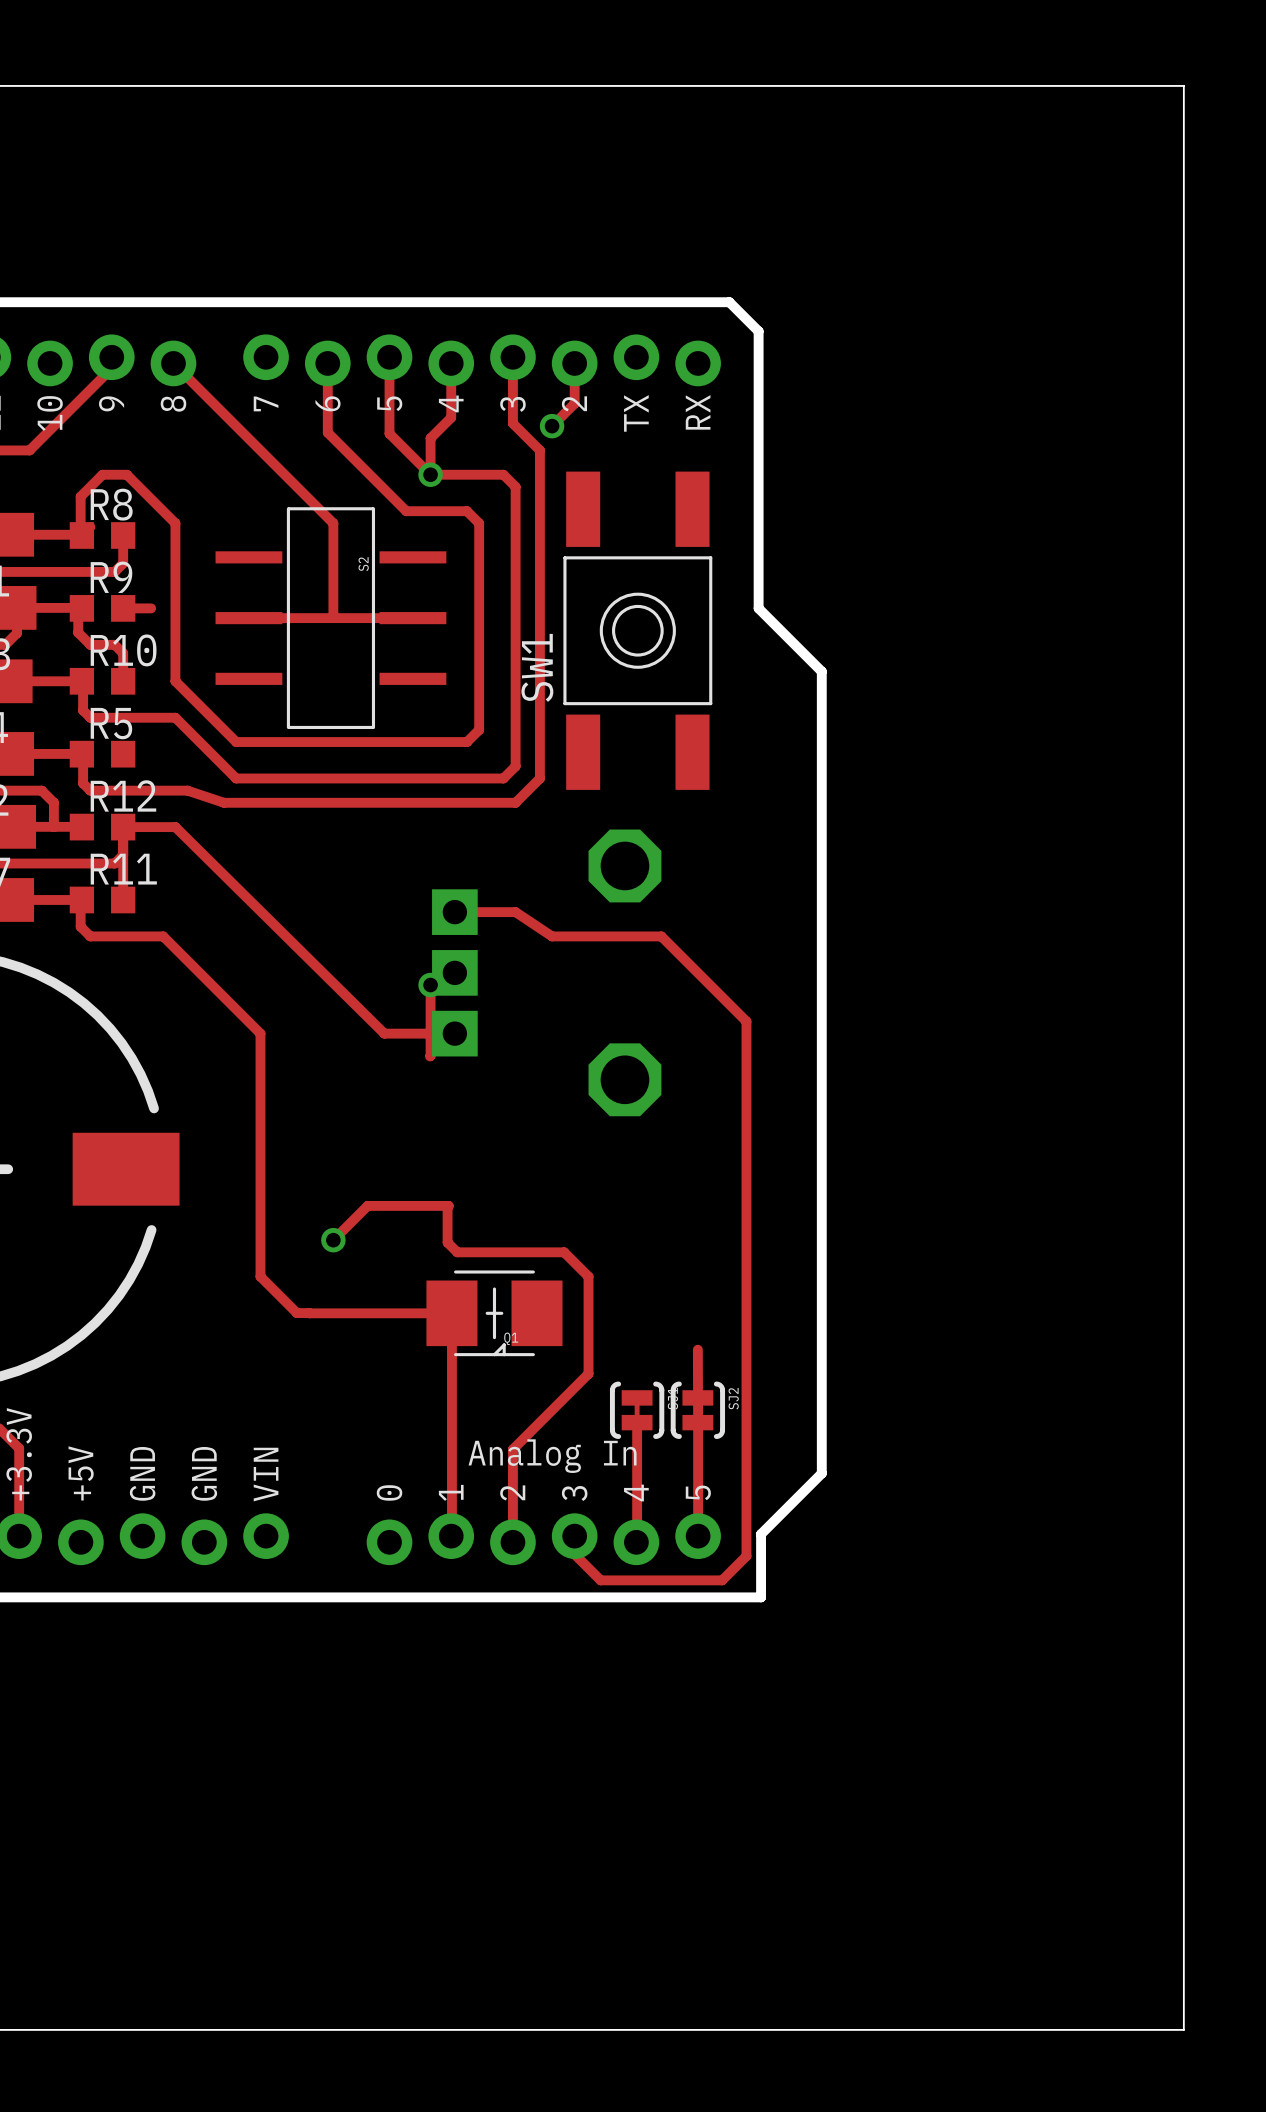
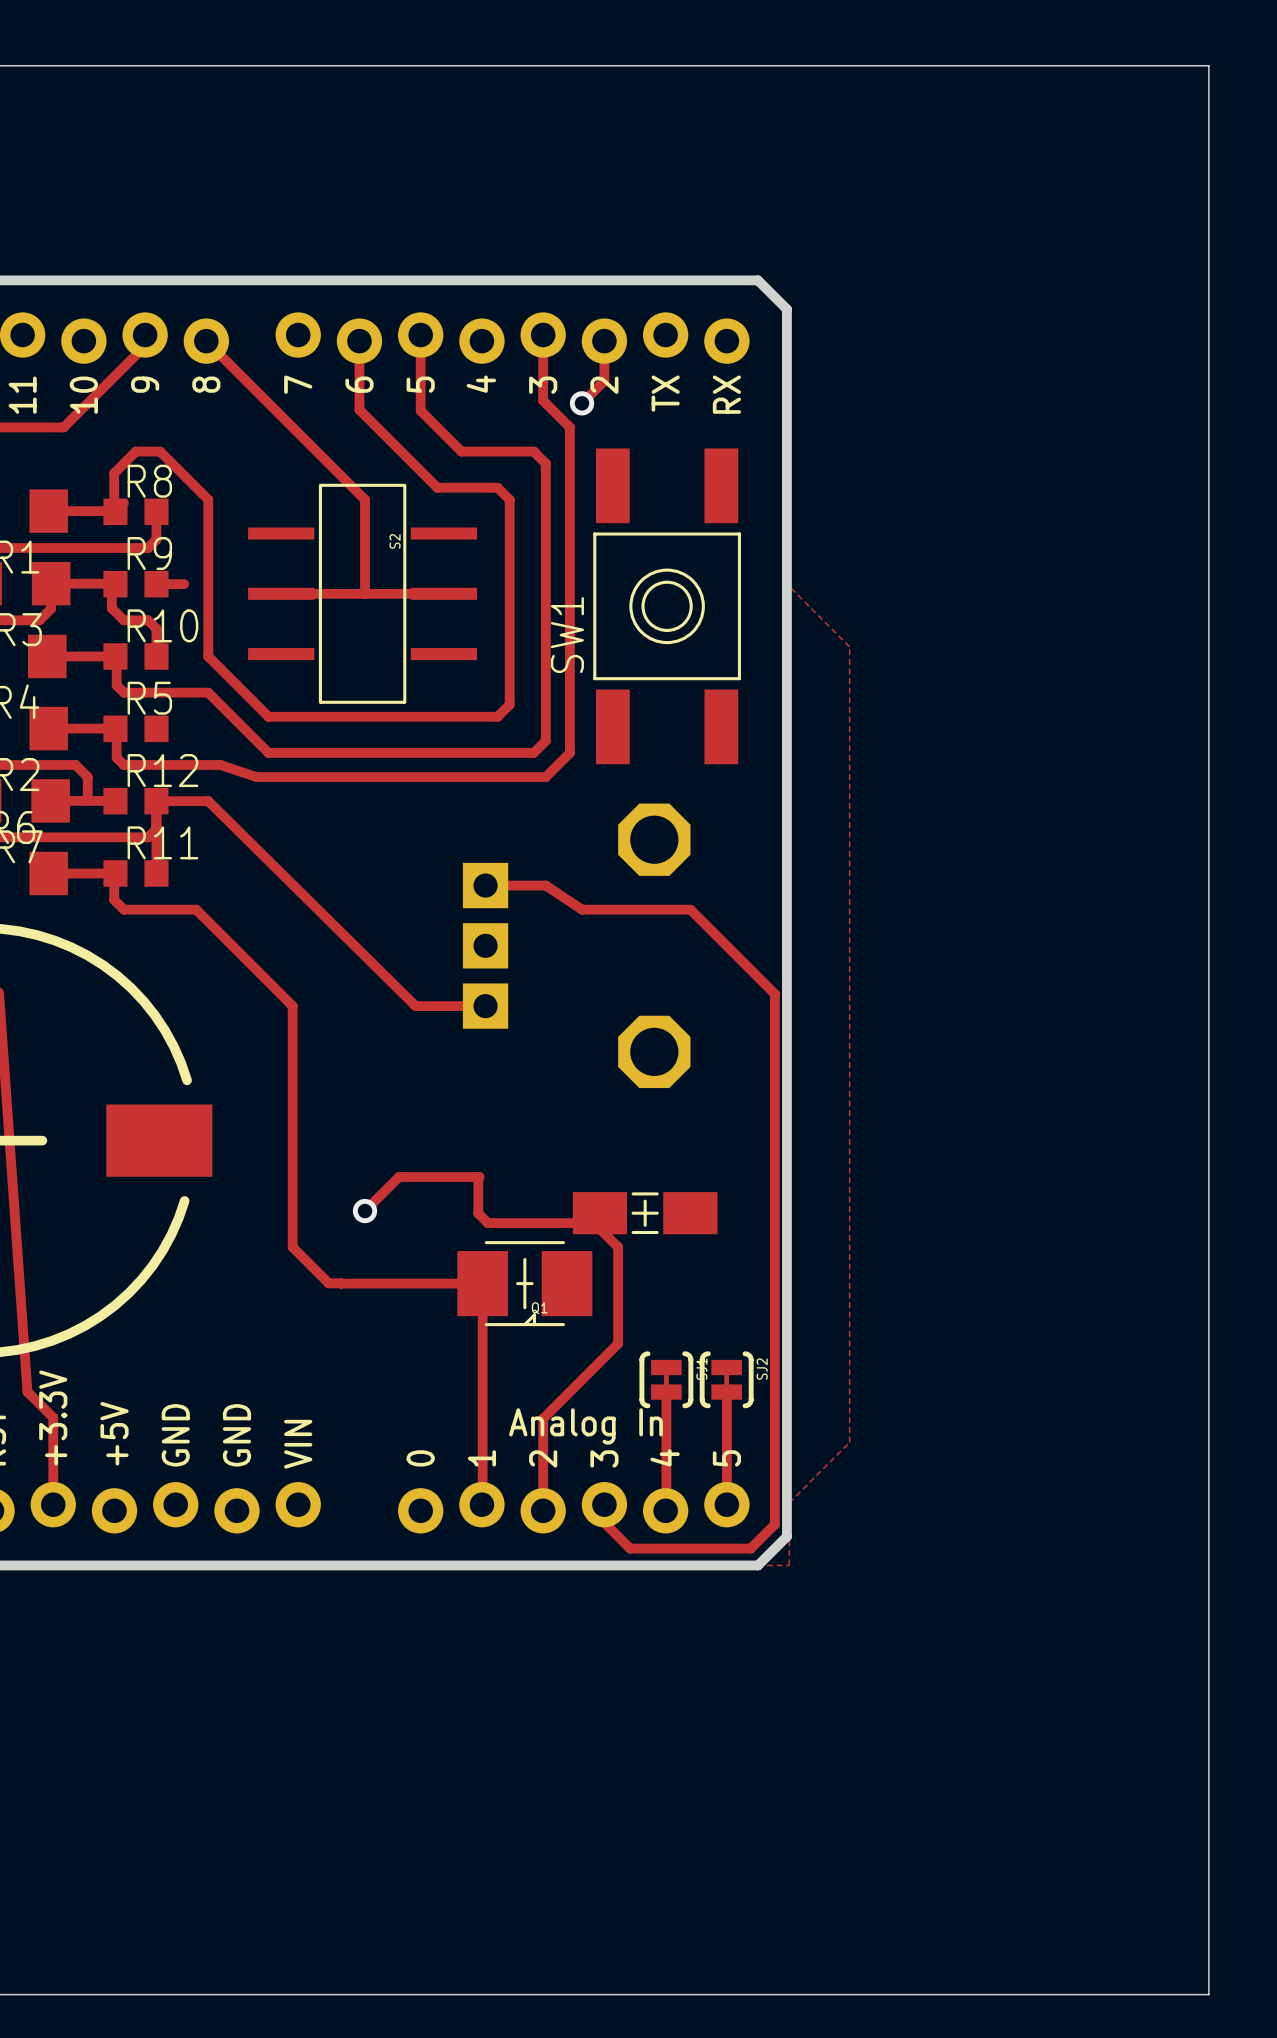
track: (451, 363) (451, 417) (430, 438) (430, 474) -> none
via: (430, 474) -> none
board edge: (758, 608) (821, 671) (821, 1473) (761, 1534) (761, 1597) (729, 1597) -> (786, 584) (786, 1536) (758, 1565)
track: (430, 985) (430, 1056) -> none
via: (430, 985) -> none
part: none -> (645, 1213)
track: (697, 1349) (698, 1422) -> none

